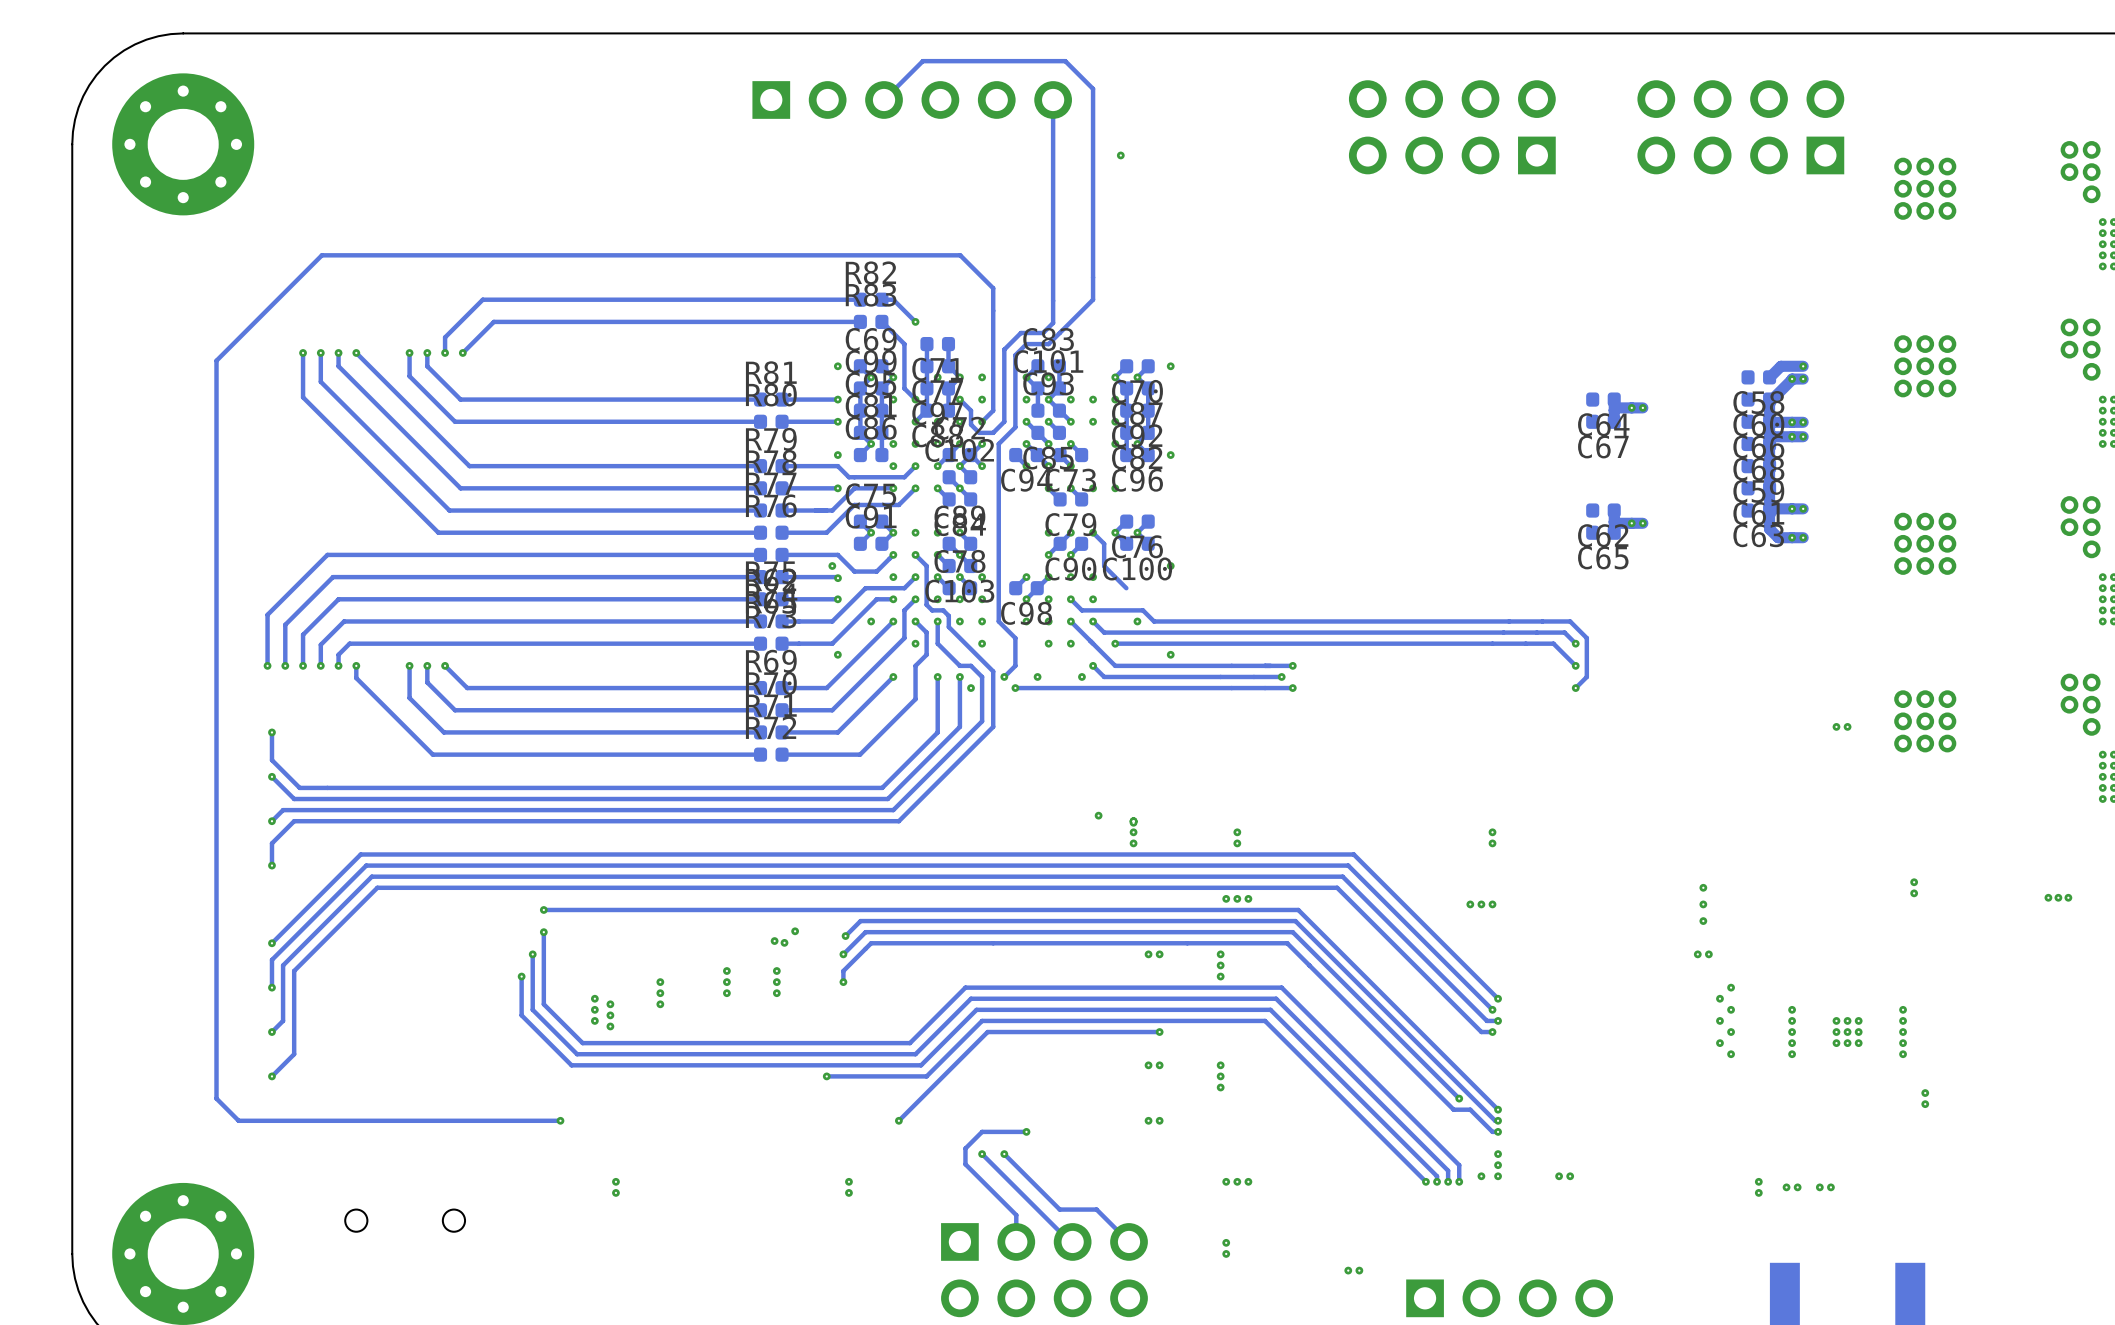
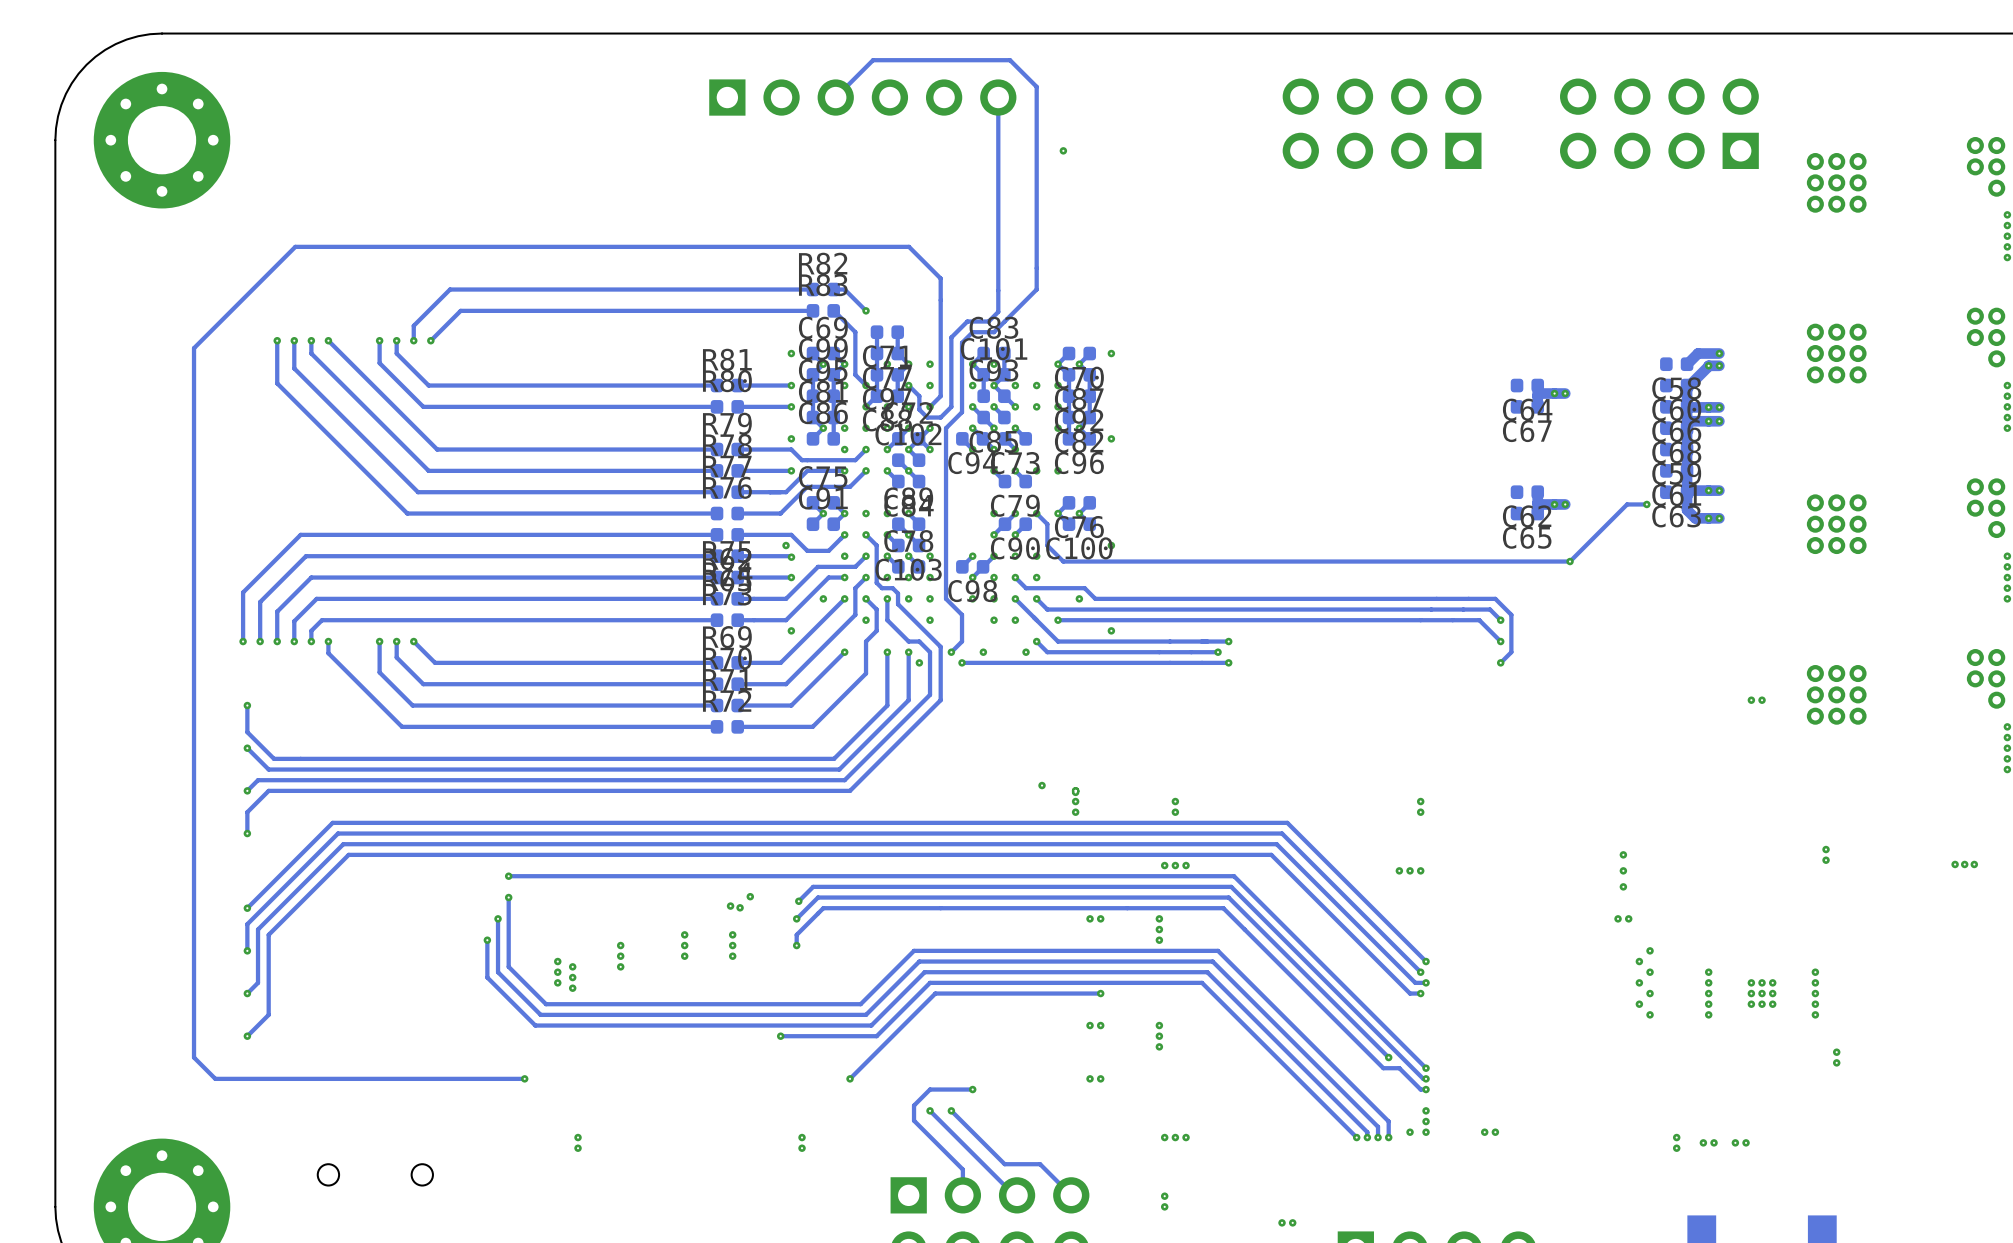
via: none -> (1646, 504)
track: (1120, 582) (1126, 588) -> (1063, 561) (1570, 561) (1627, 504) (1646, 504)
via: none -> (1570, 561)

